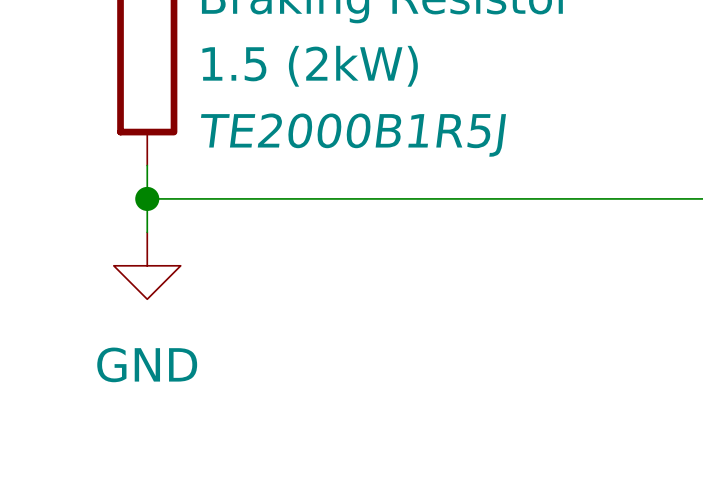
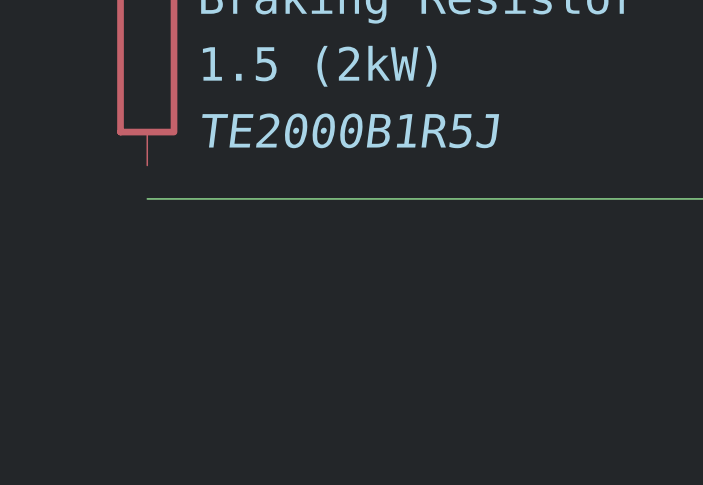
wire: (147, 165) (147, 232) -> none
junction: (147, 198) -> none
power symbol: GND (147, 265) -> none

